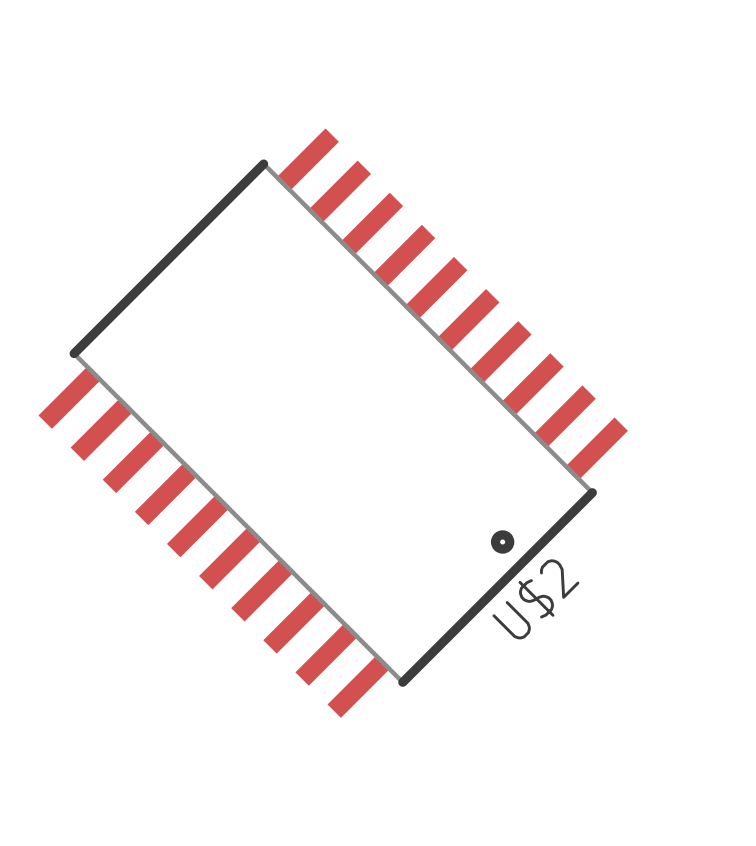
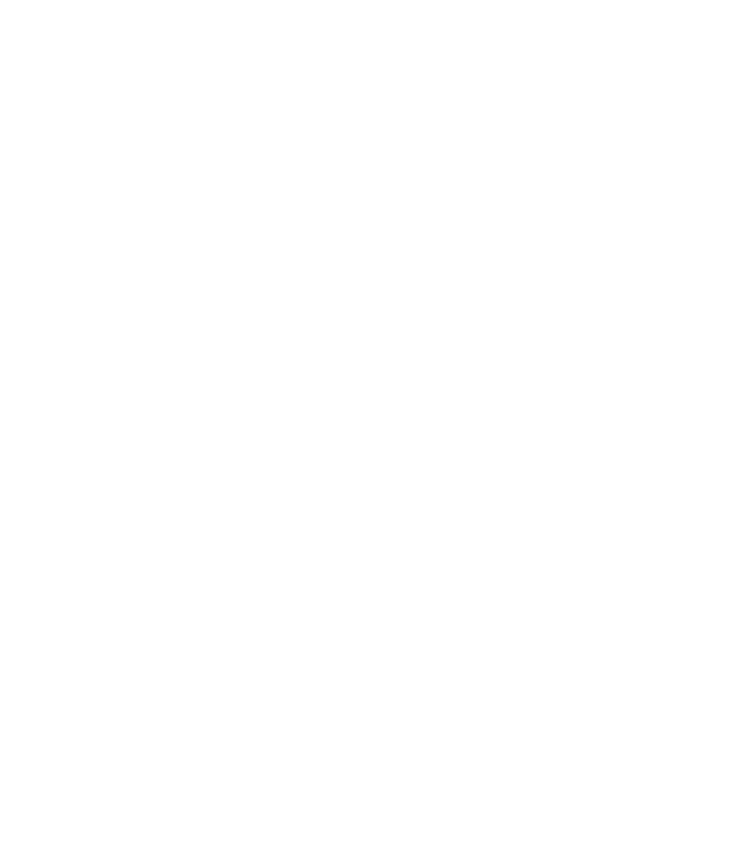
U$2: (333, 423) -> none

